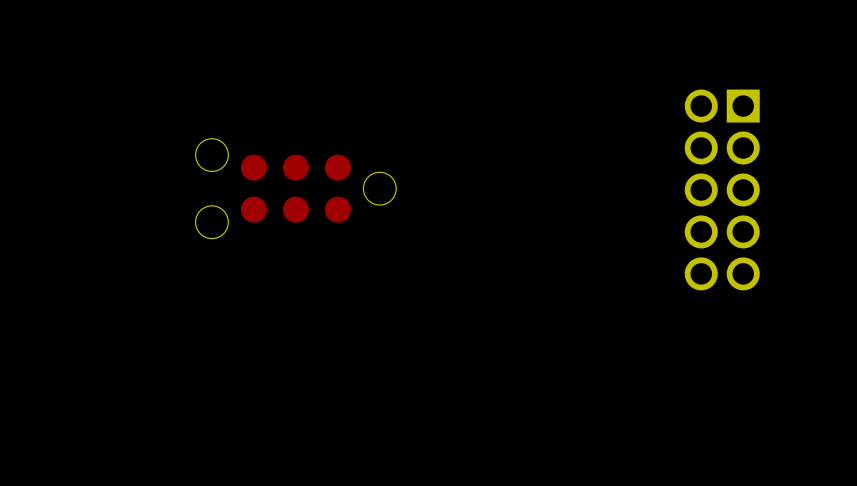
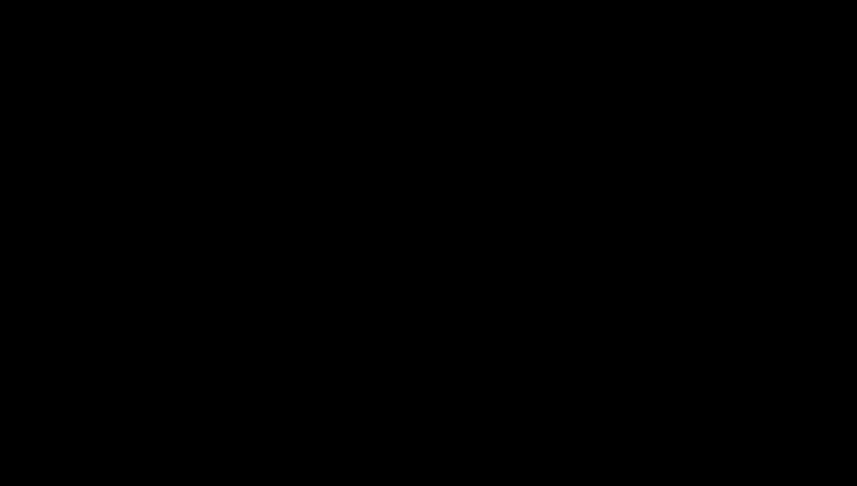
part: (295, 188) -> none
part: (722, 189) -> none

